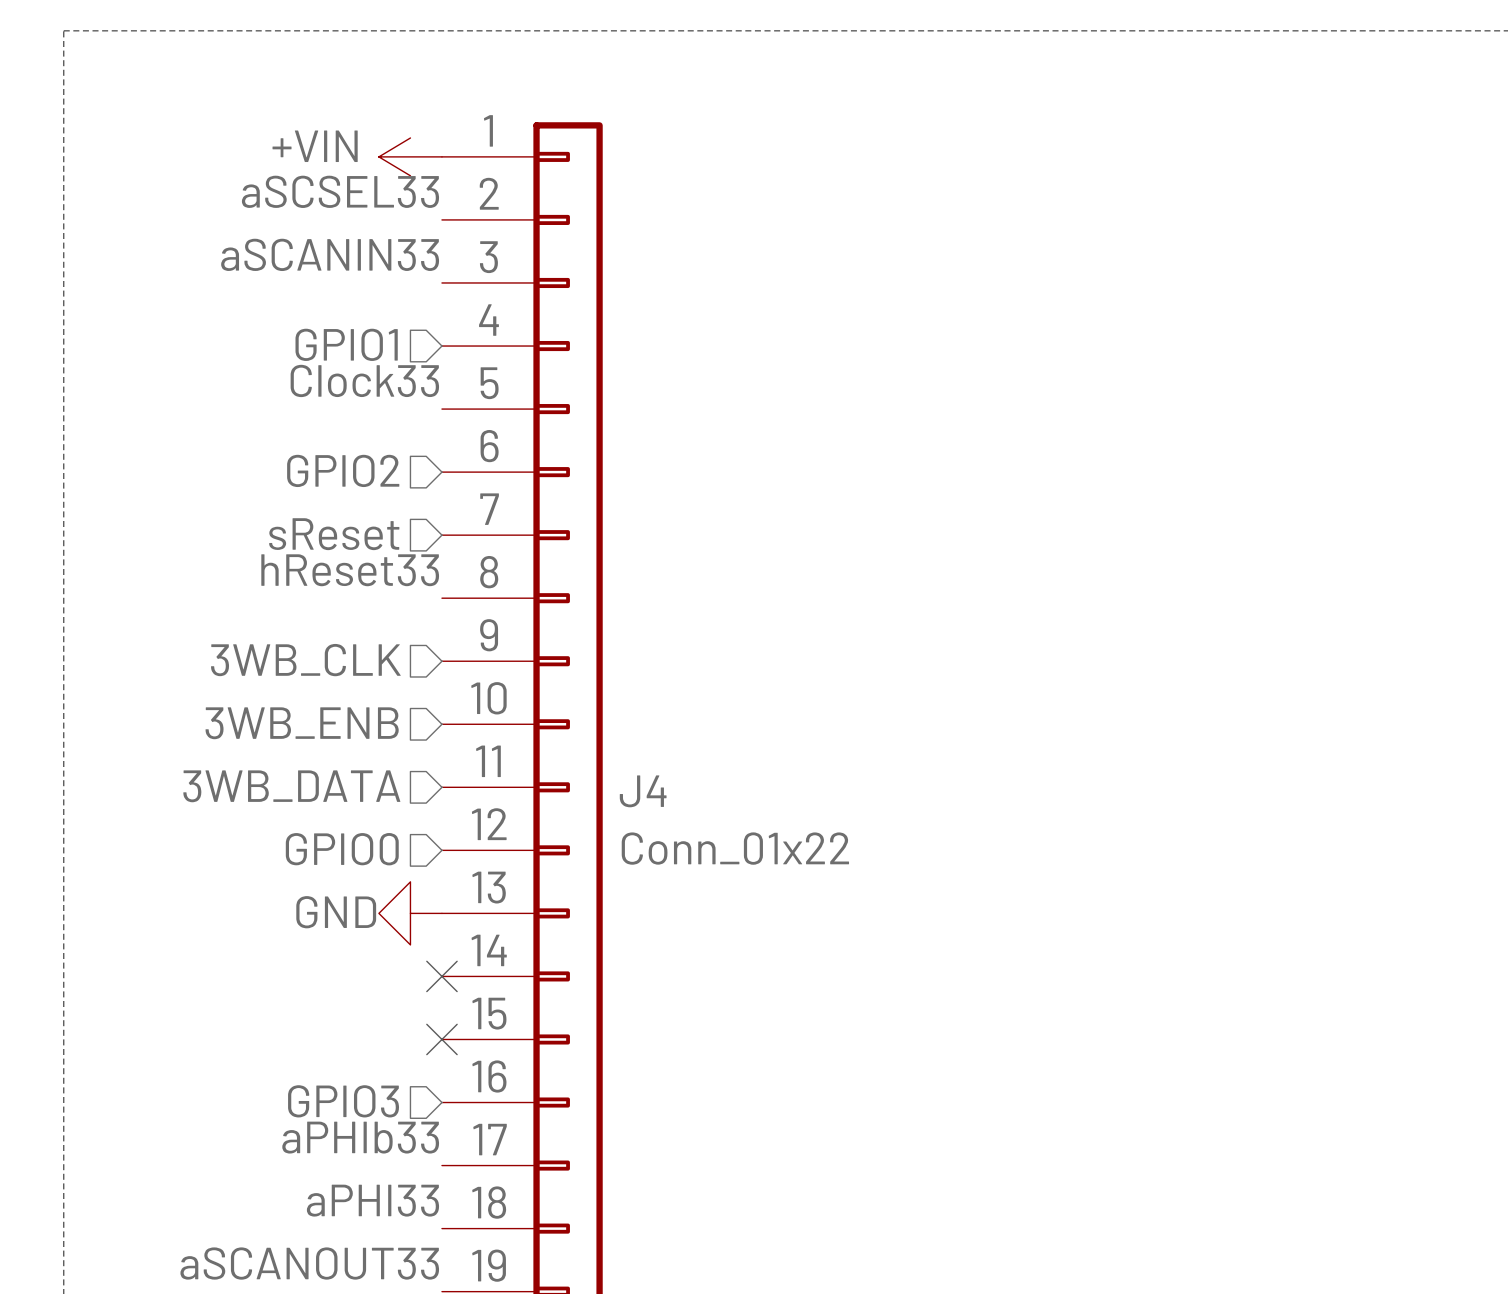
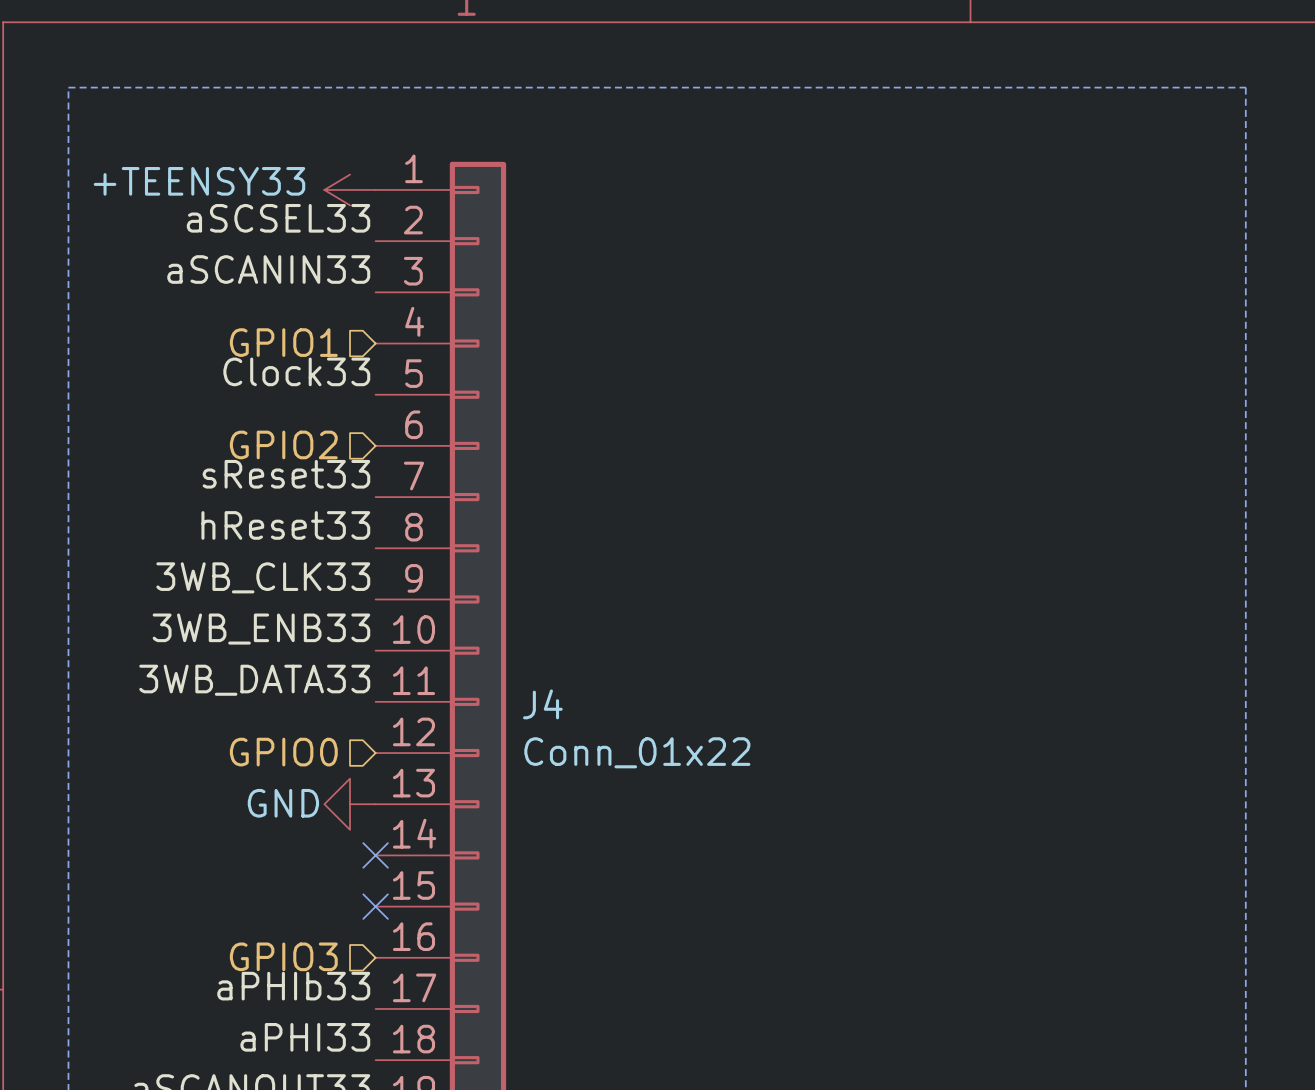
power symbol: +VIN (410, 156) -> +TEENSY33 (350, 189)
label: none -> sReset33 (286, 474)
hierarchical label: sReset (334, 534) -> none
label: none -> 3WB_CLK33 (263, 577)
hierarchical label: 3WB_CLK (305, 660) -> none
label: none -> 3WB_ENB33 (261, 629)
hierarchical label: 3WB_ENB (302, 723) -> none
label: none -> 3WB_DATA33 (254, 680)
hierarchical label: 3WB_DATA (291, 786) -> none

